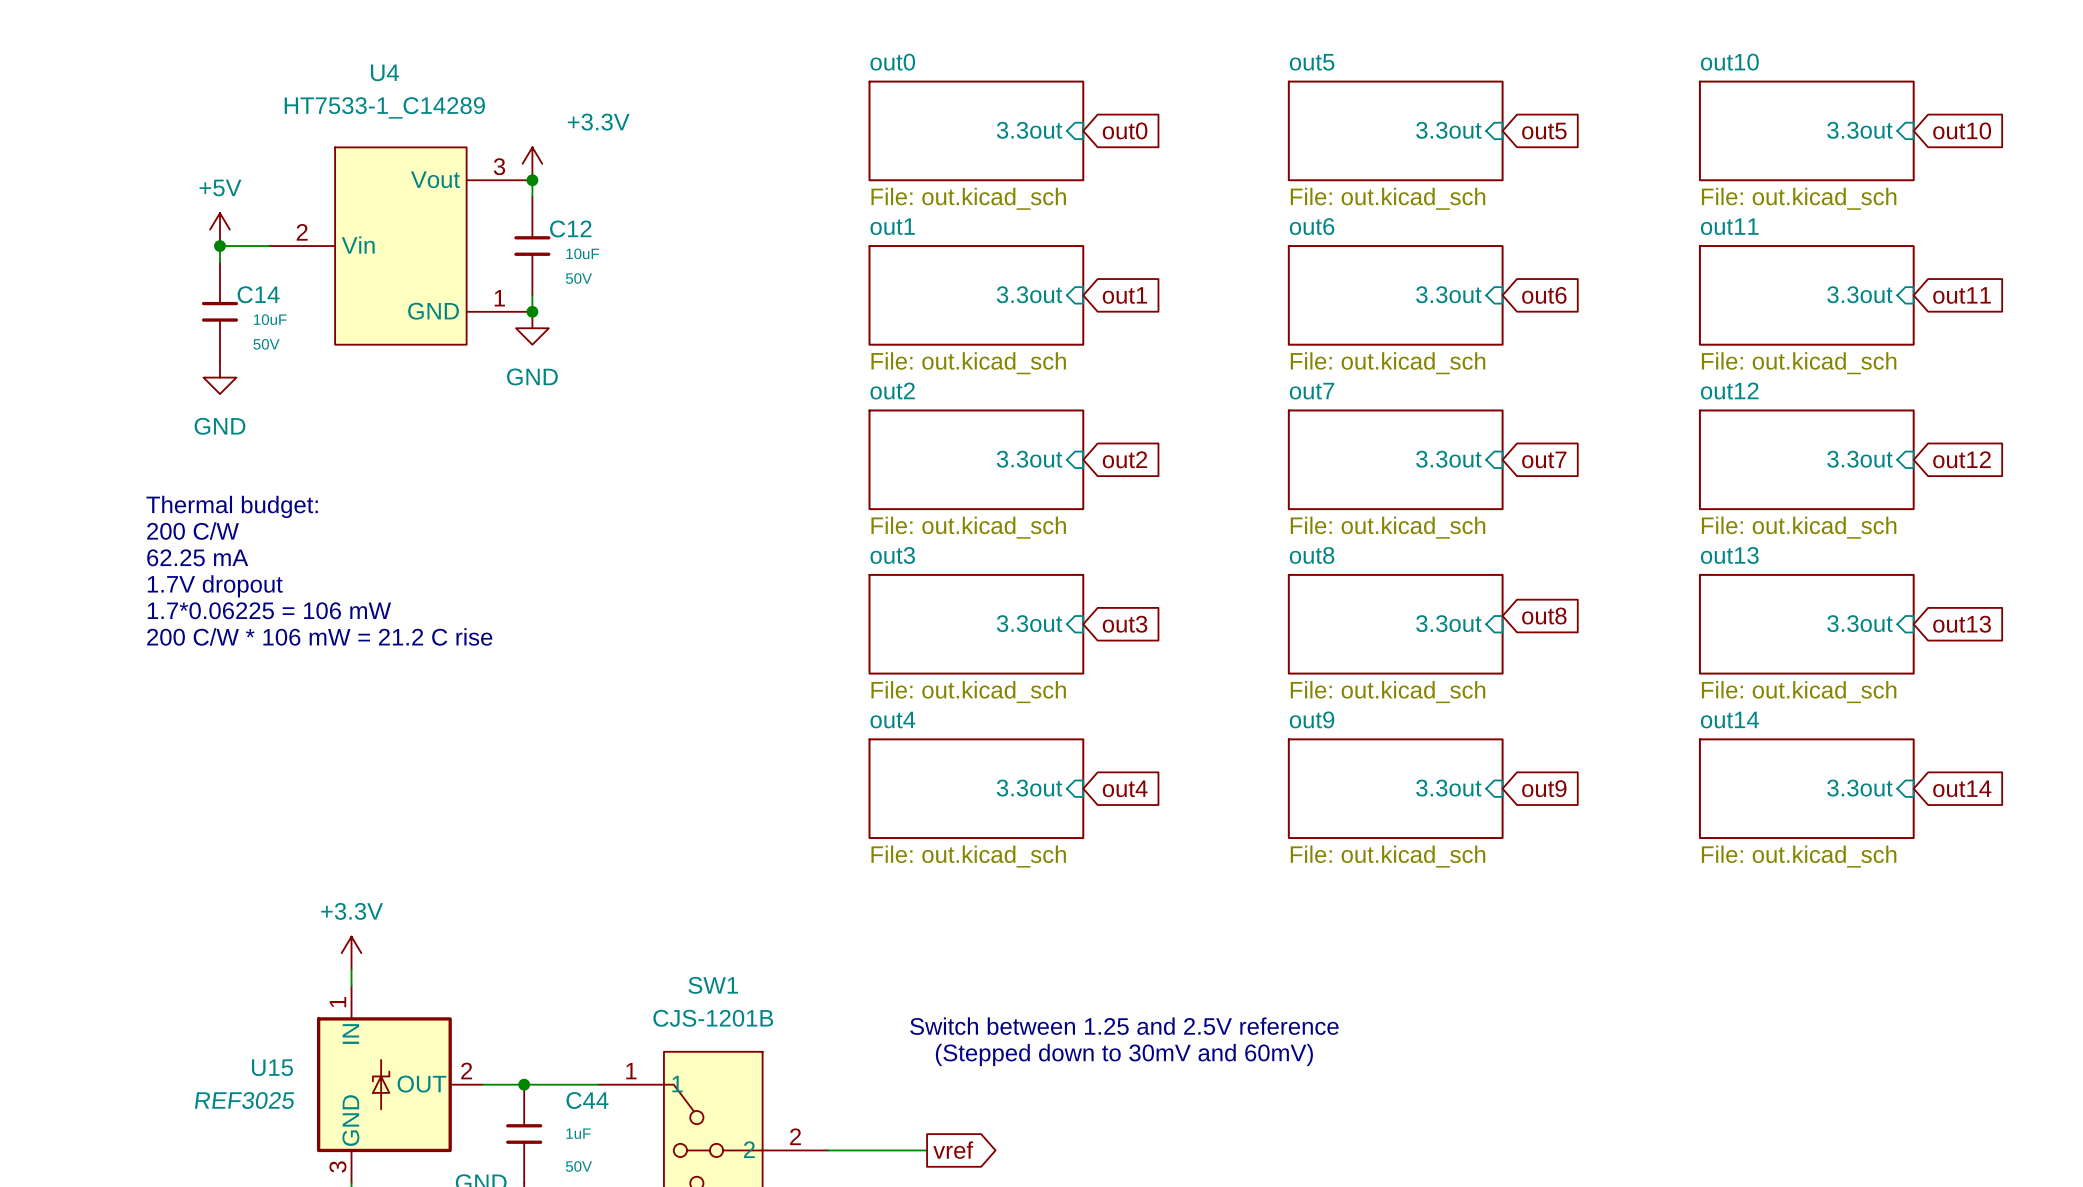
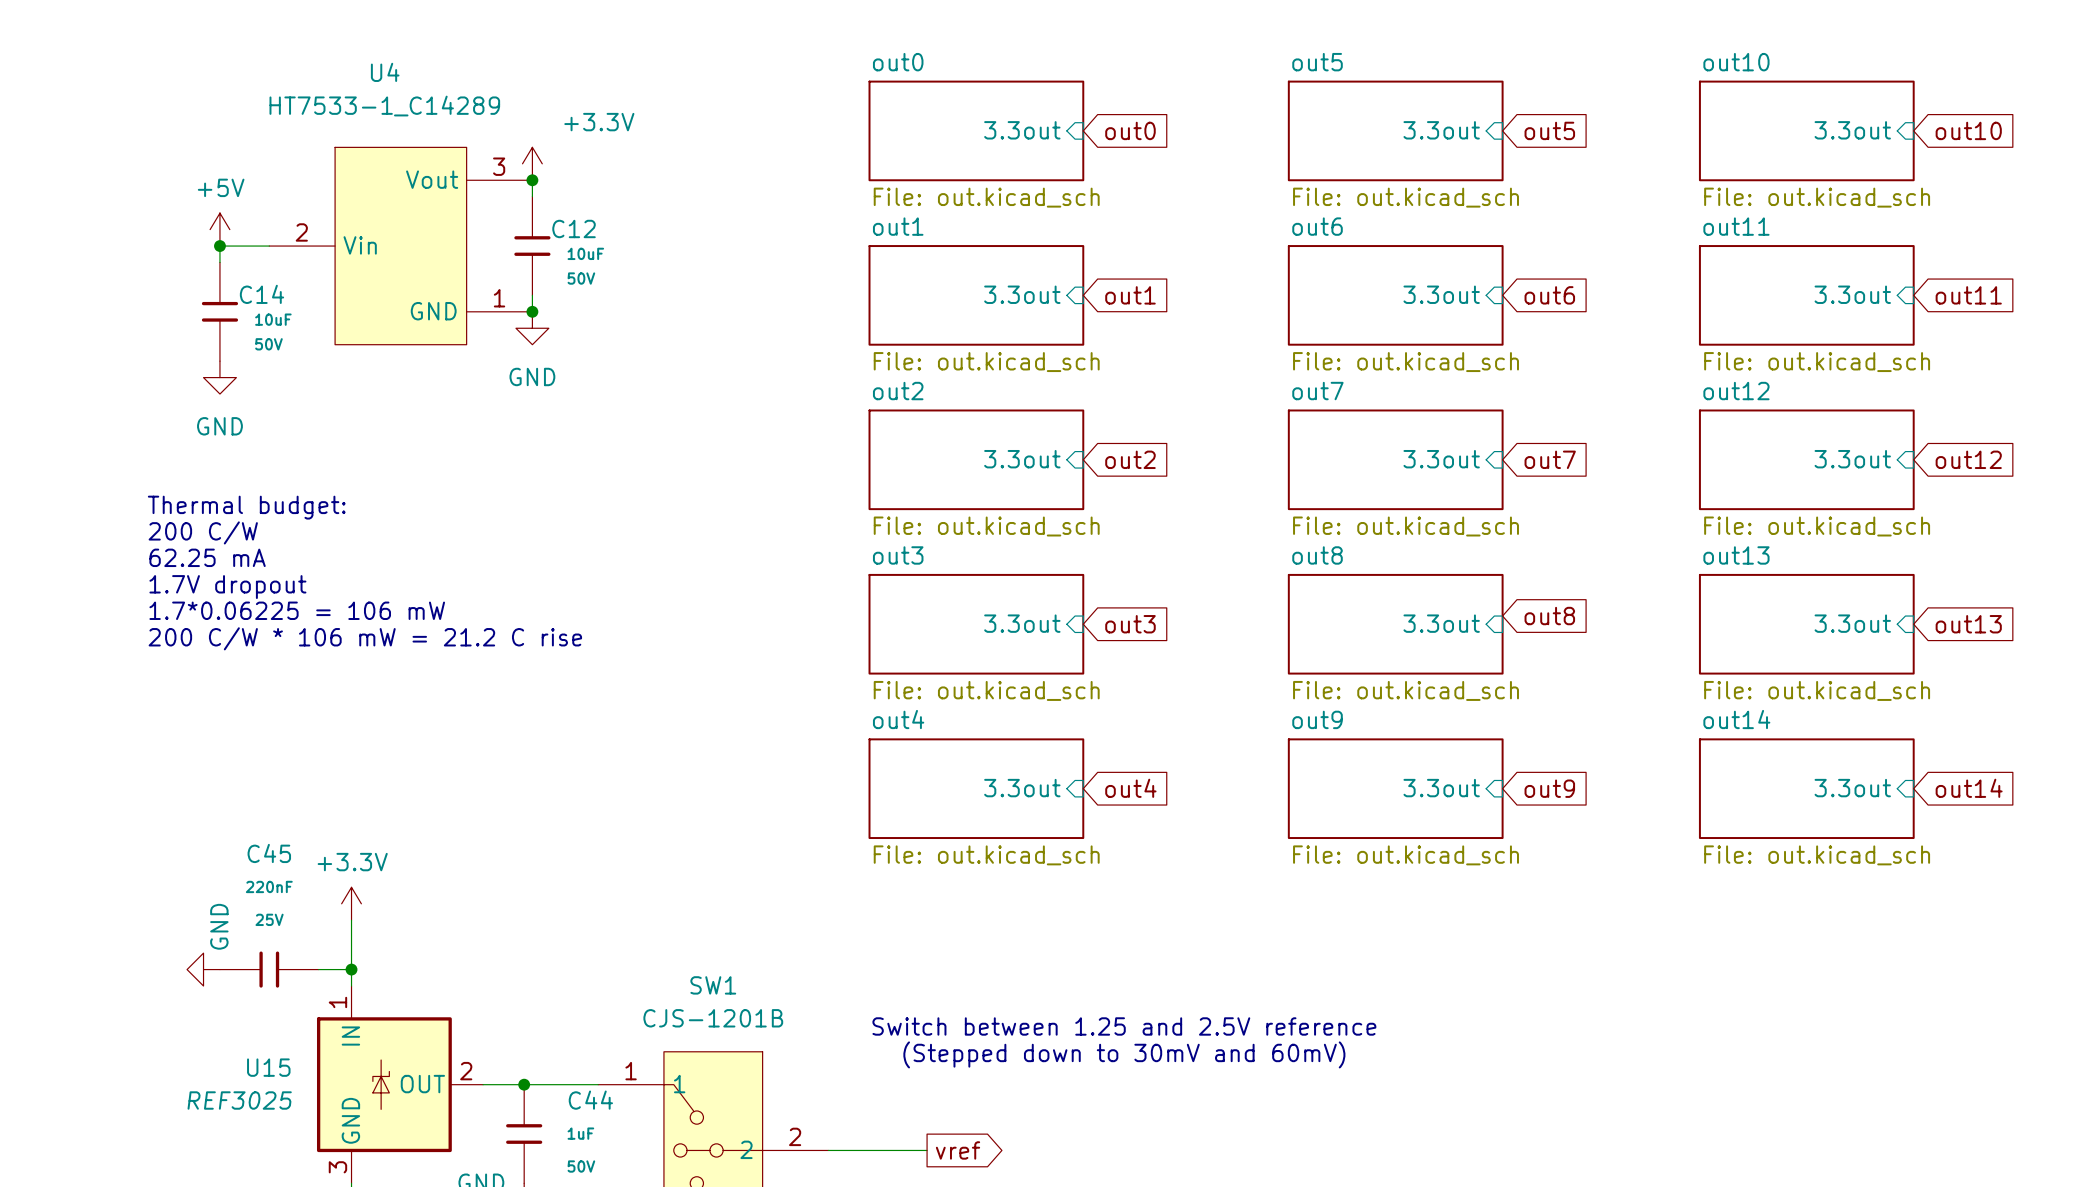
wire: none -> (351, 920) (351, 969) (318, 969)
power symbol position: +3.3V (351, 953) -> +3.3V (351, 903)
power symbol: none -> GND (203, 969)
C45: none -> 220nF (269, 969)
junction: none -> (351, 969)

